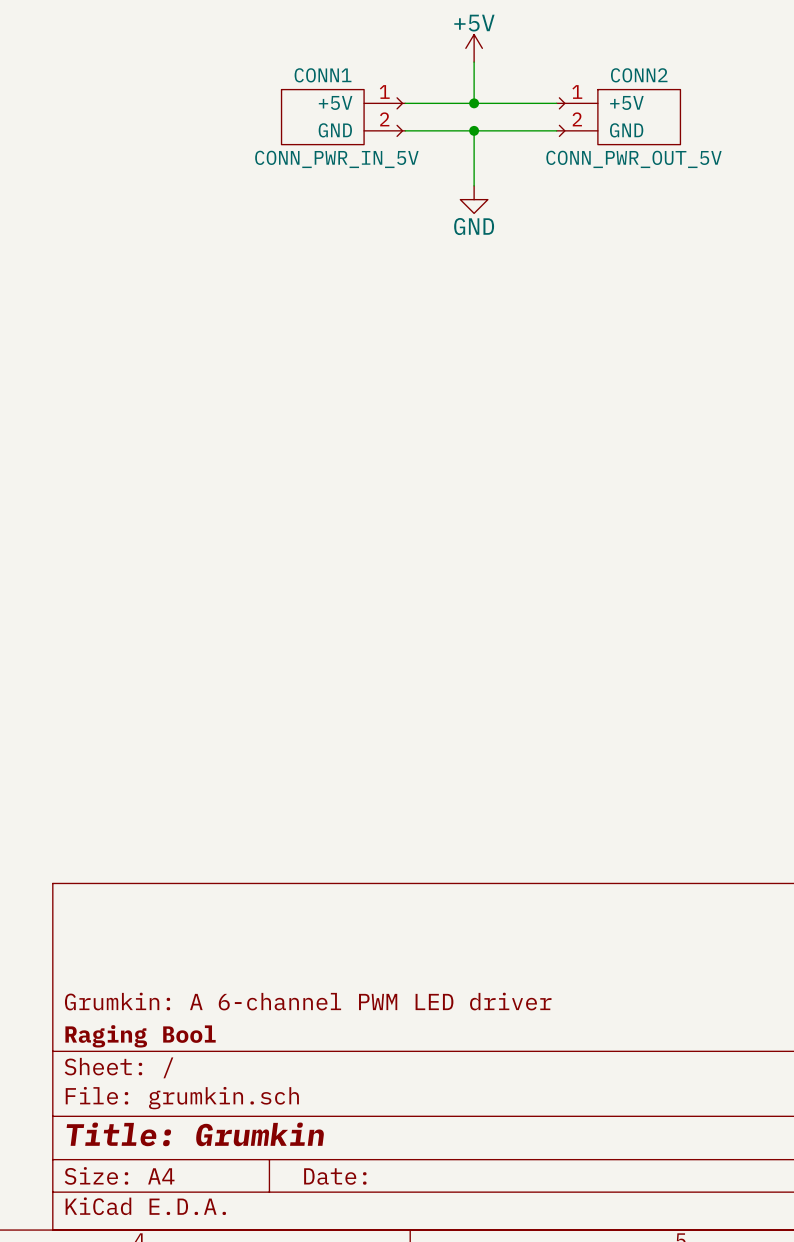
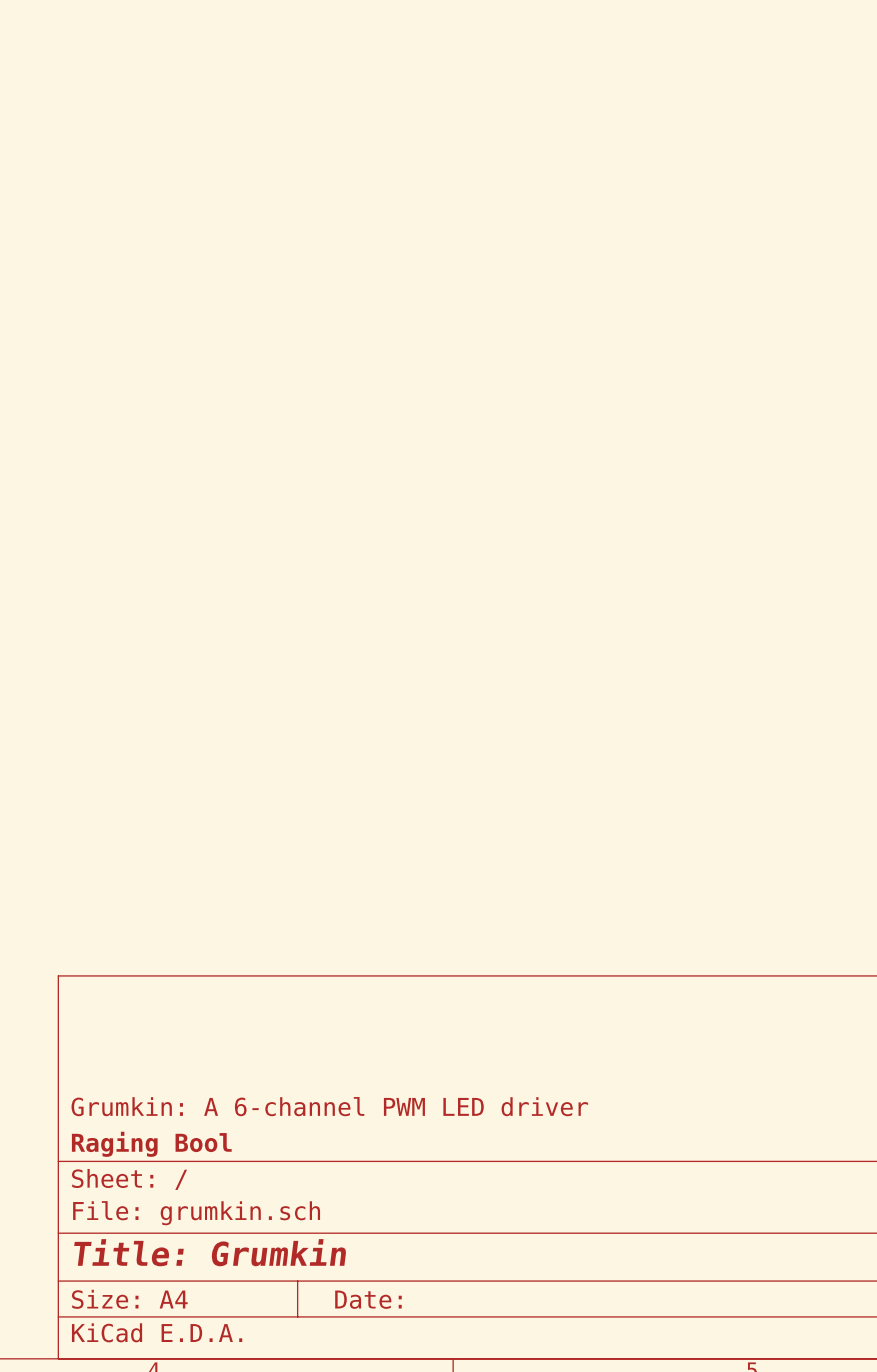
power symbol: +5V (474, 48) -> none
wire: (474, 62) (474, 103) -> none
wire: (405, 103) (556, 103) -> none
junction: (474, 103) -> none
CONN1: CONN_PWR_IN_5V (343, 117) -> none
CONN2: CONN_PWR_OUT_5V (618, 117) -> none
wire: (405, 130) (556, 130) -> none
wire: (474, 130) (474, 185) -> none
junction: (474, 130) -> none
power symbol: GND (474, 199) -> none

